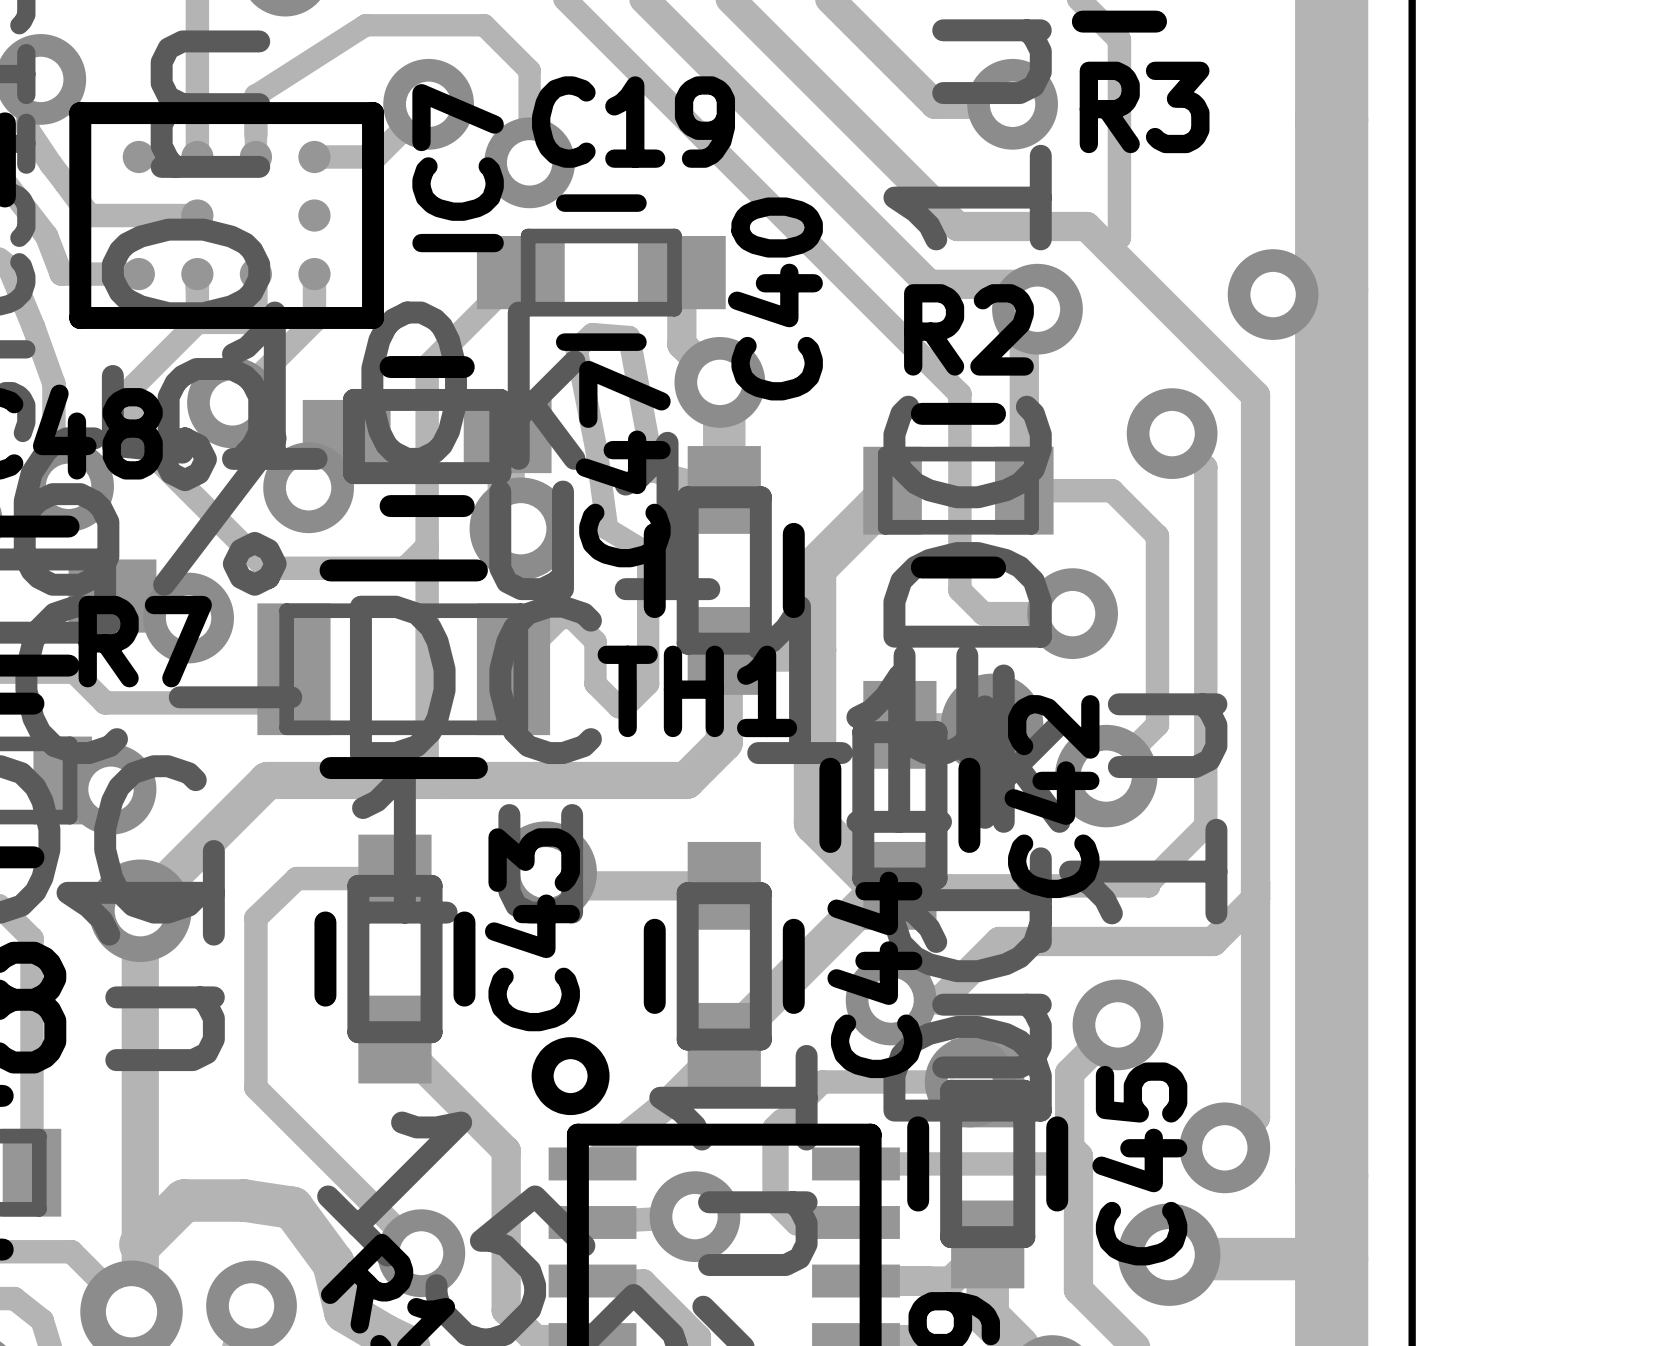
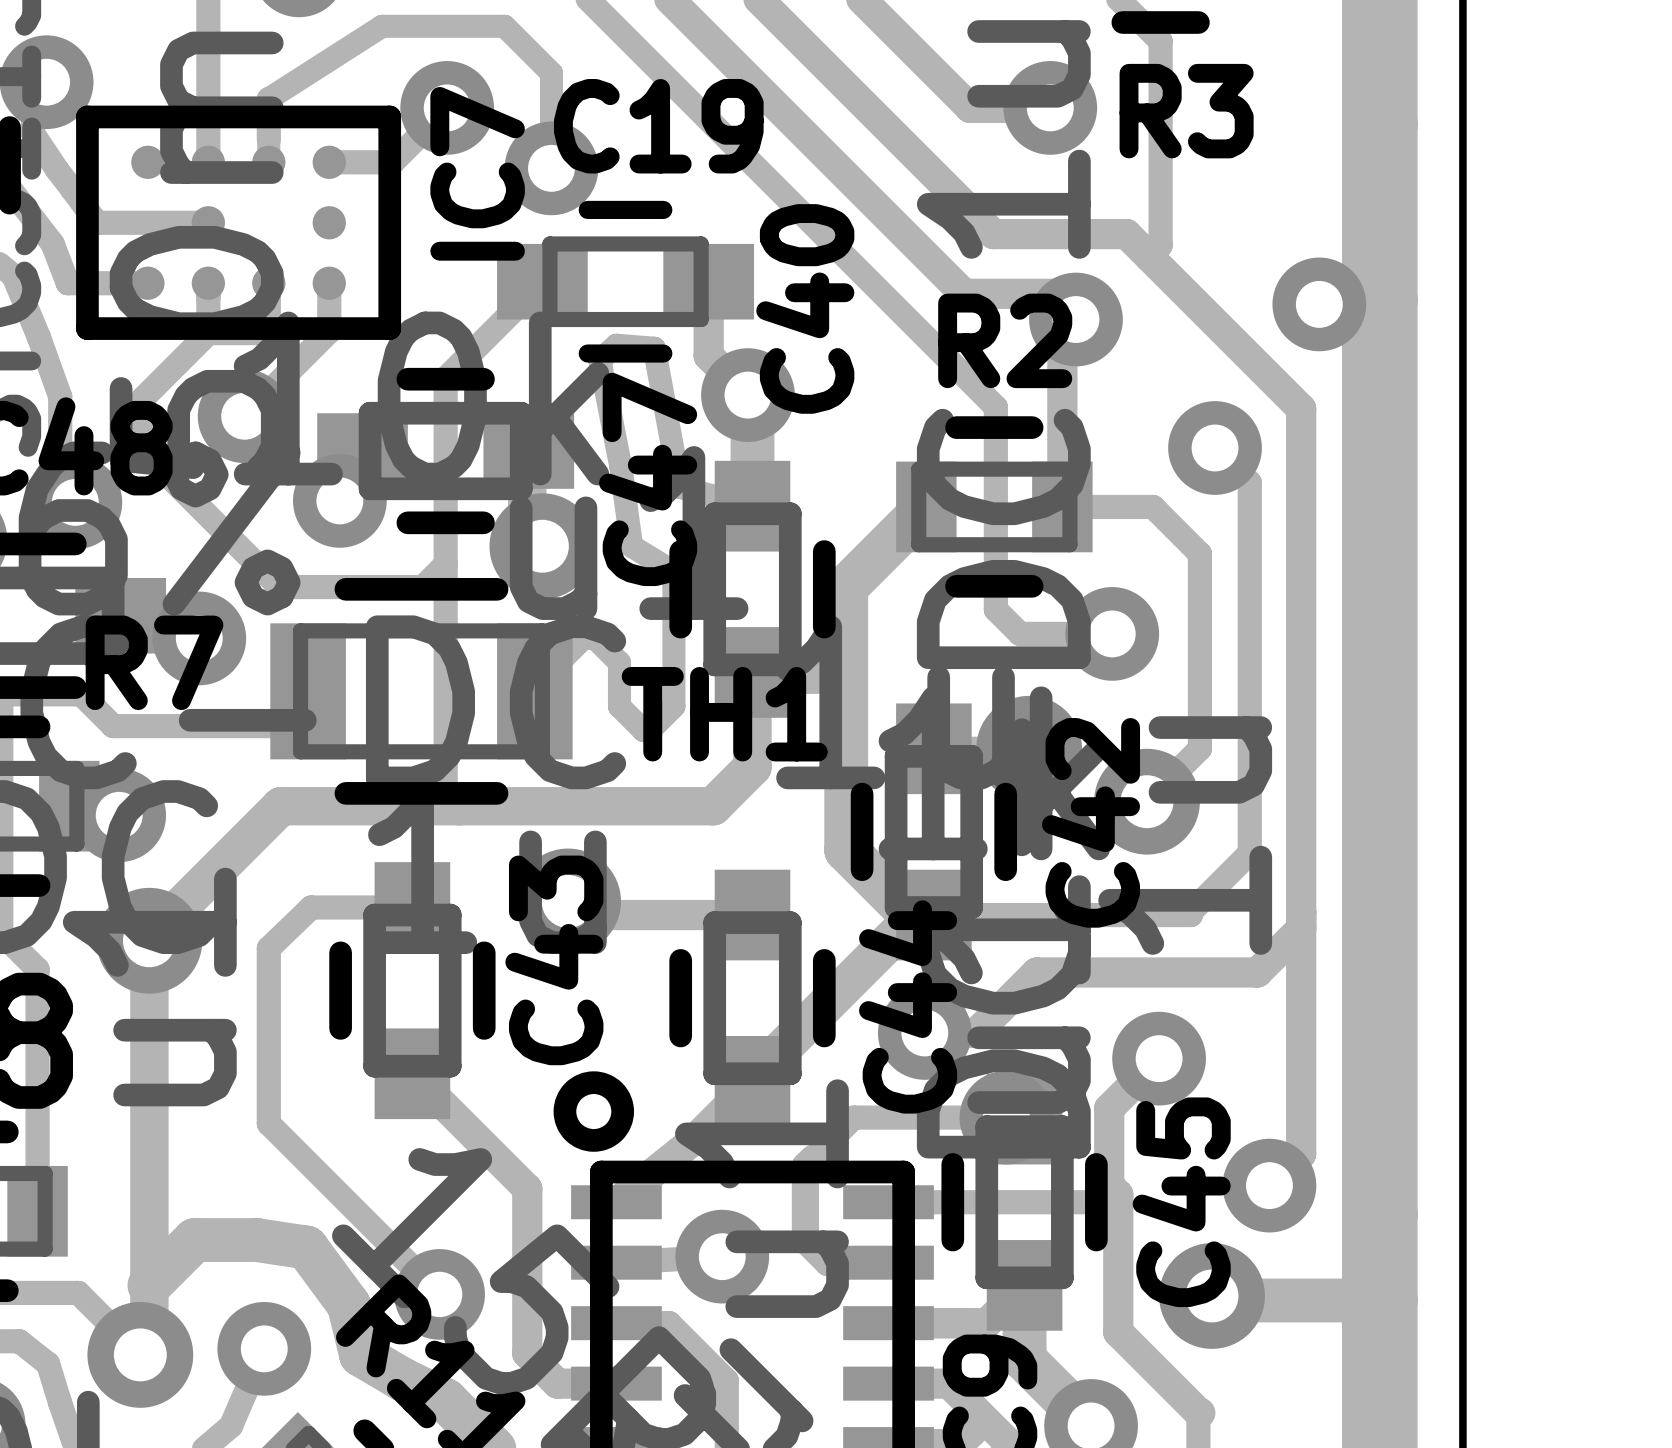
via position: (308, 487) -> (339, 500)

